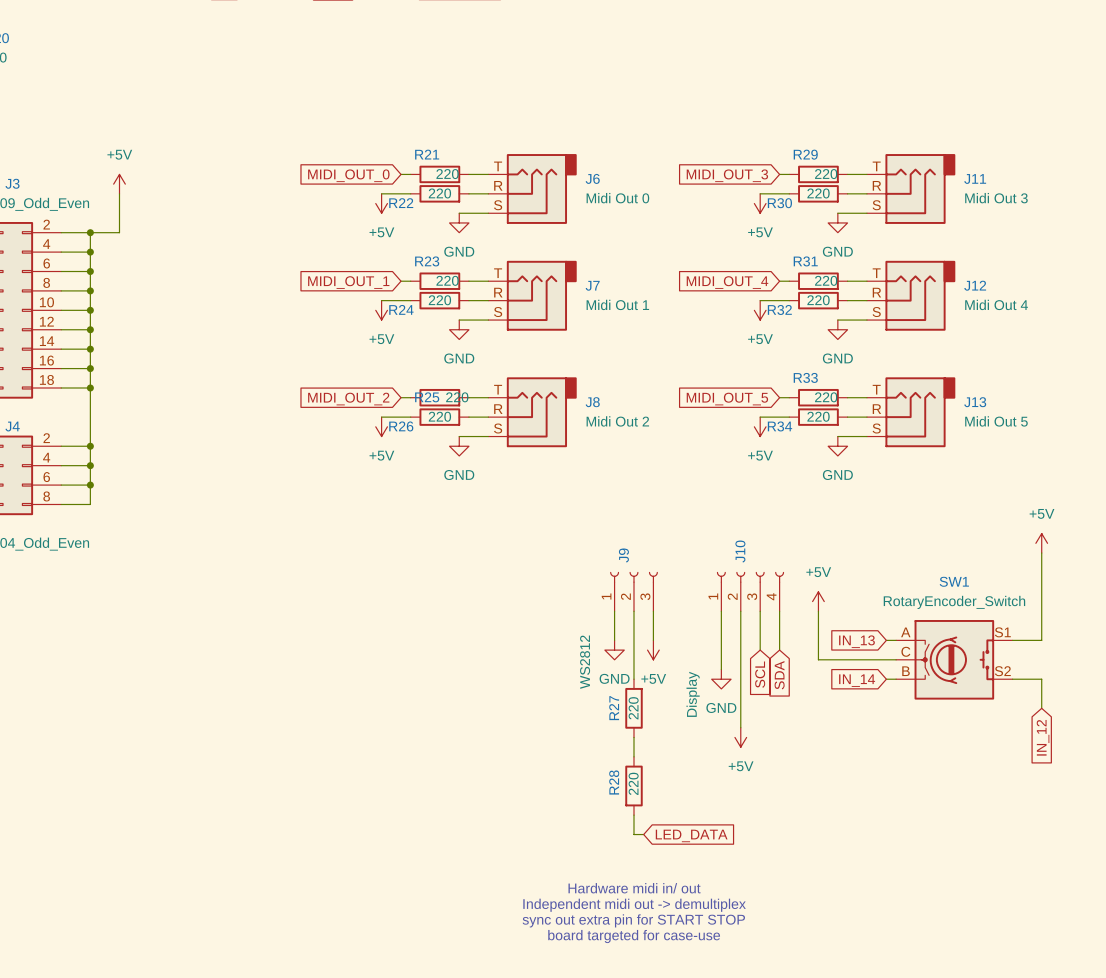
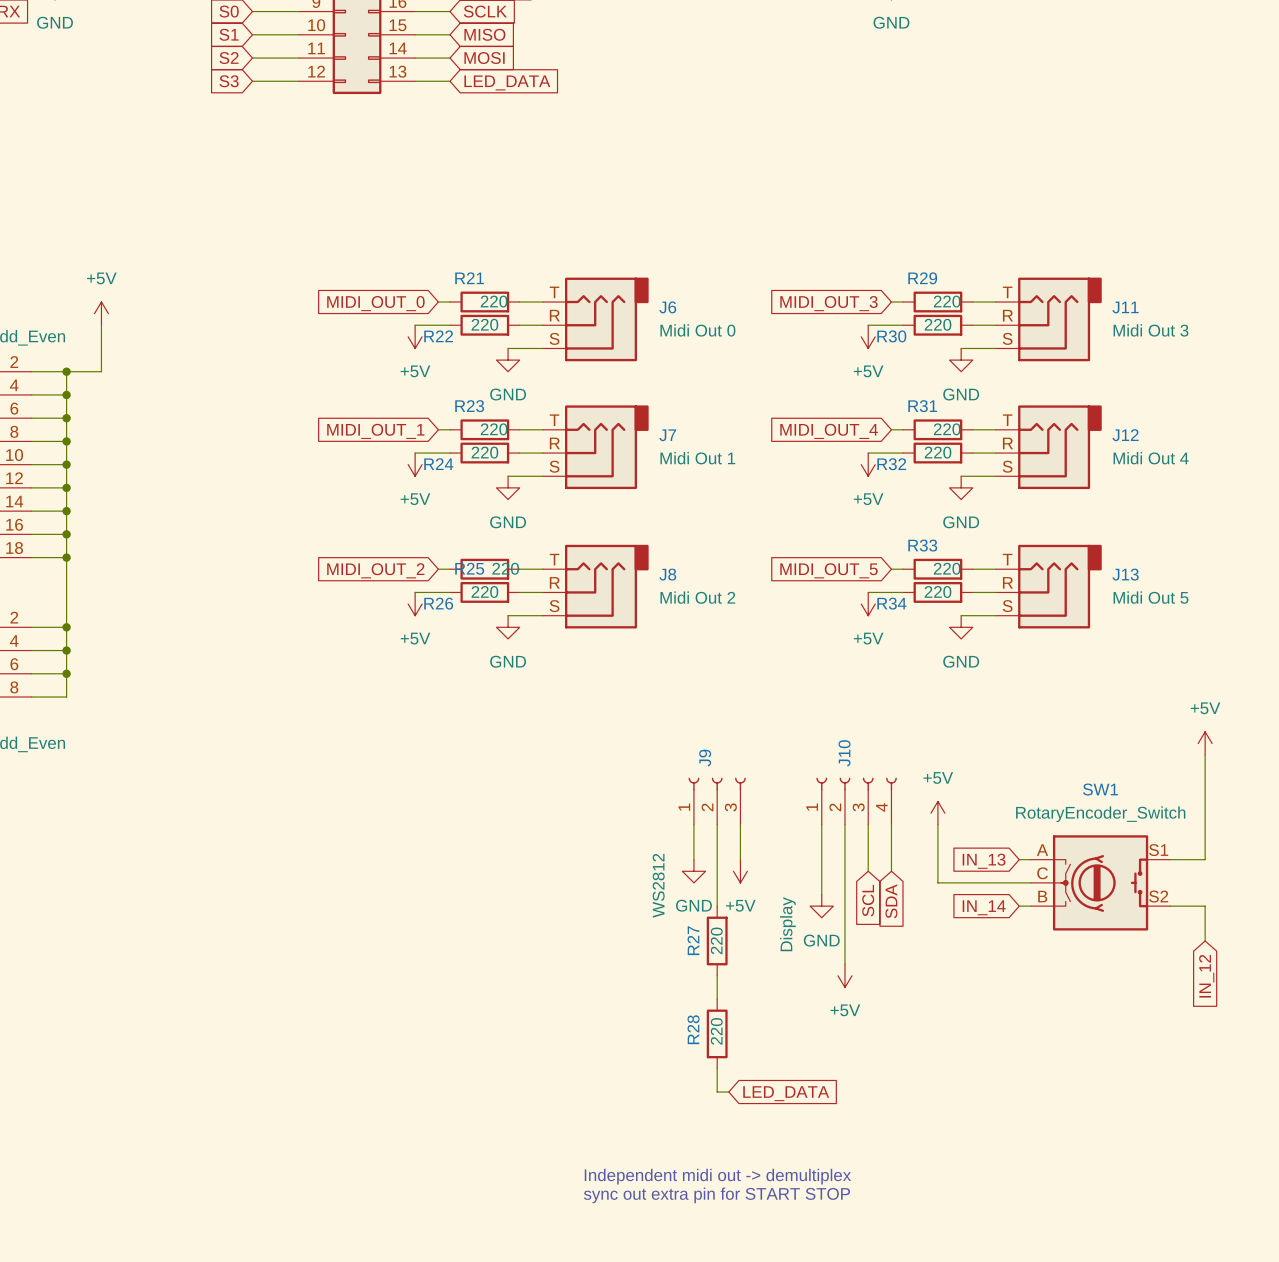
text: Hardware midi in/ out (634, 888) -> none
text: board targeted for case-use (634, 936) -> none

